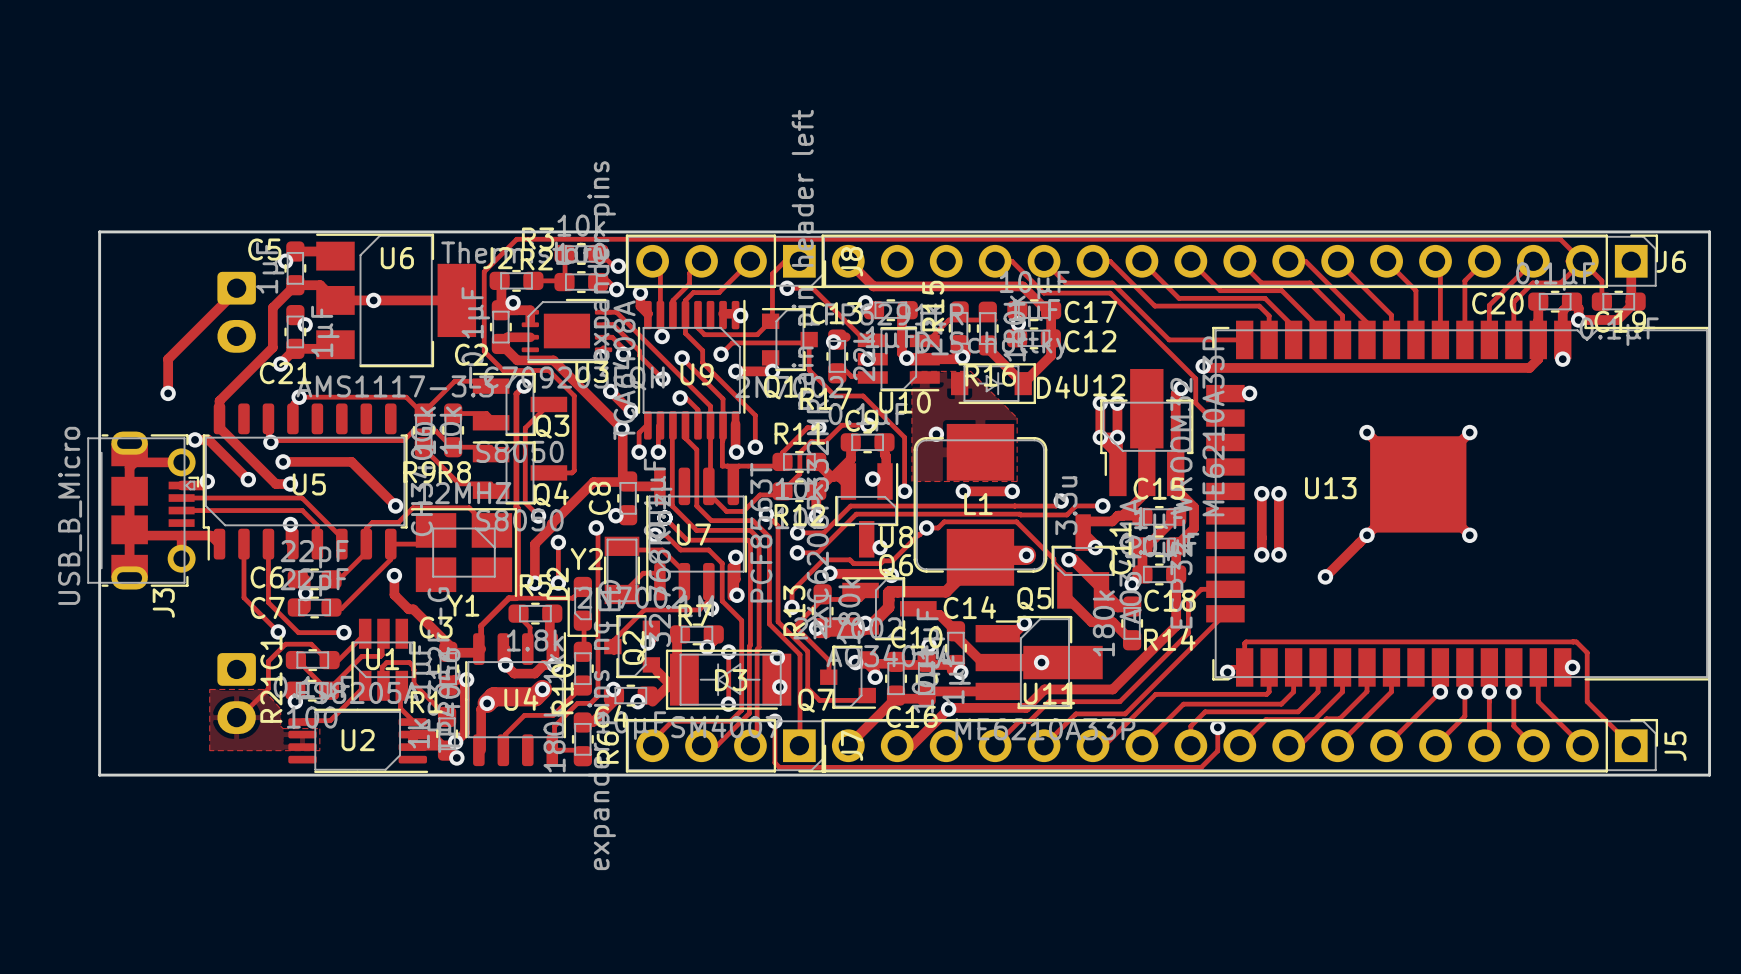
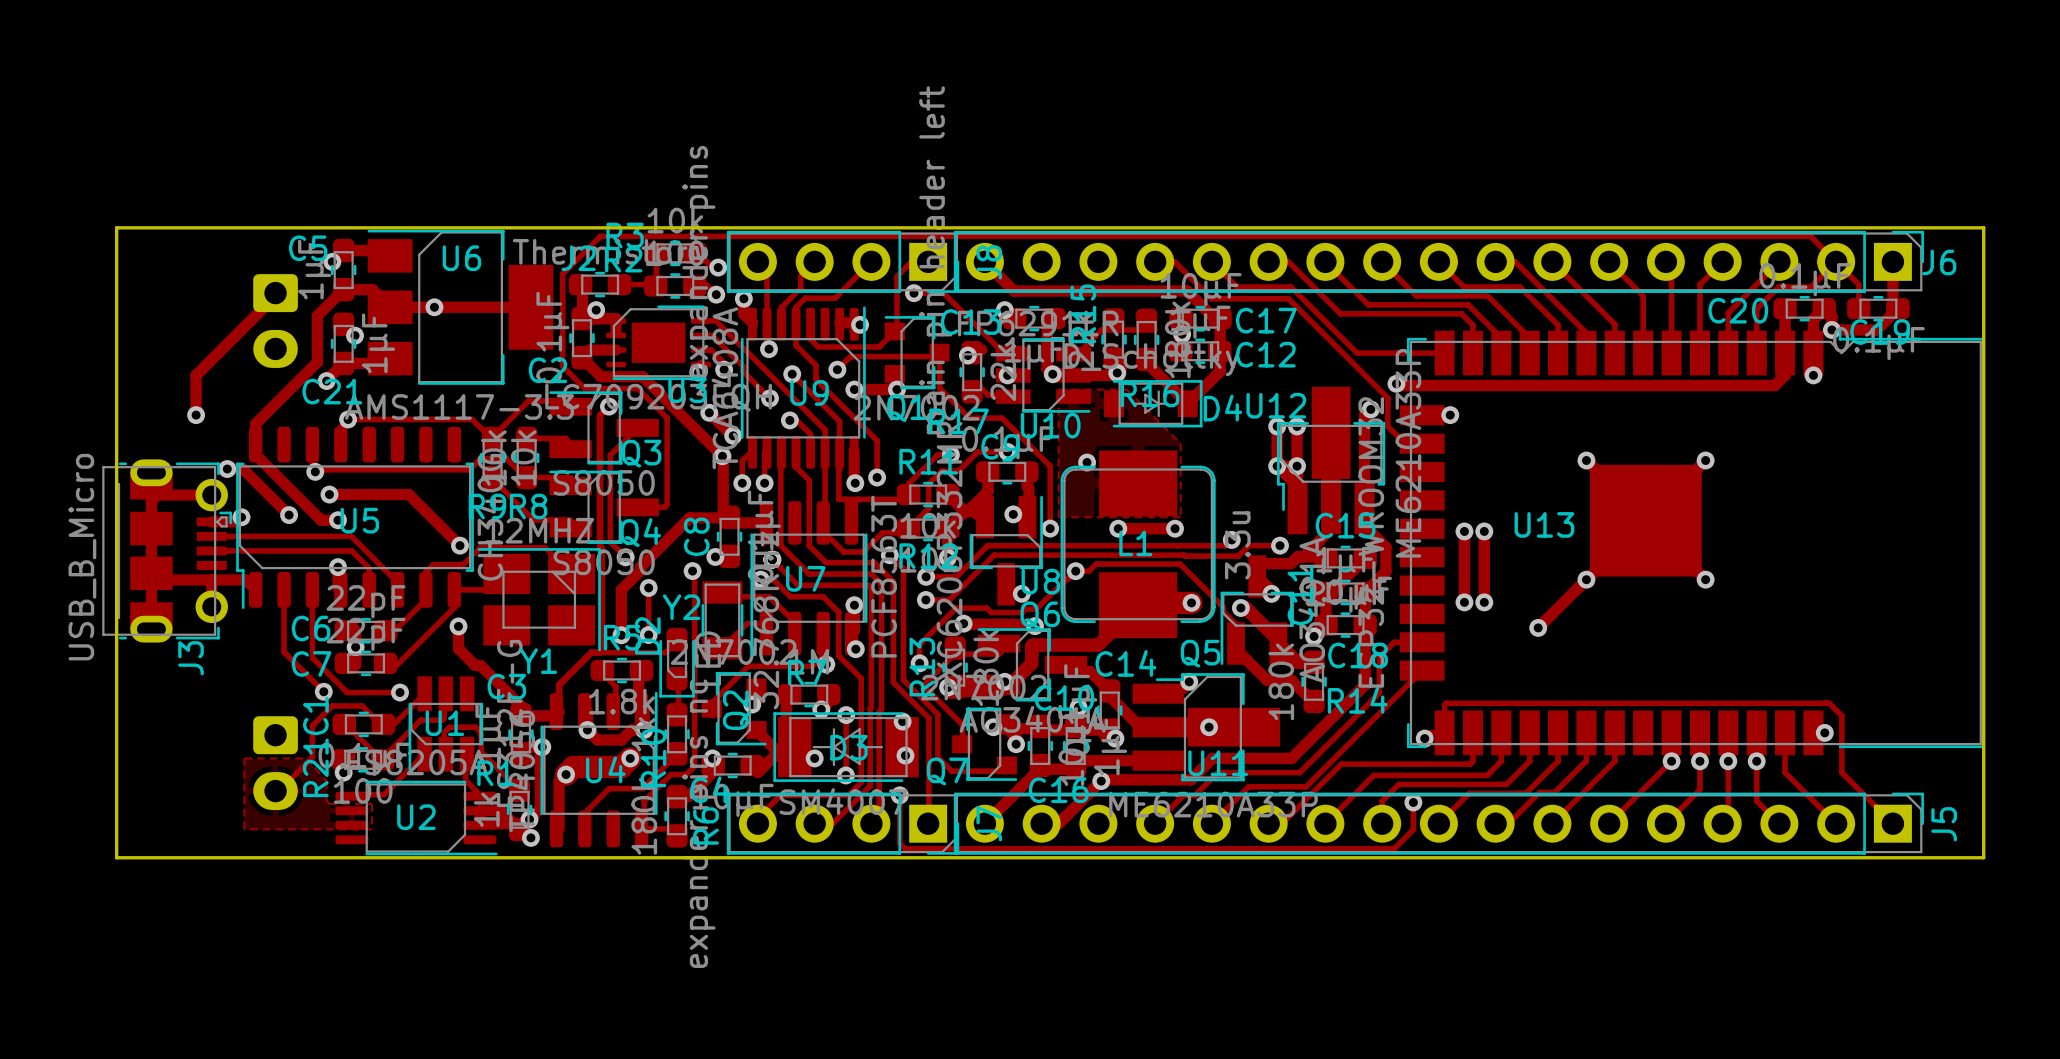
via position: (637, 701) -> (814, 758)

